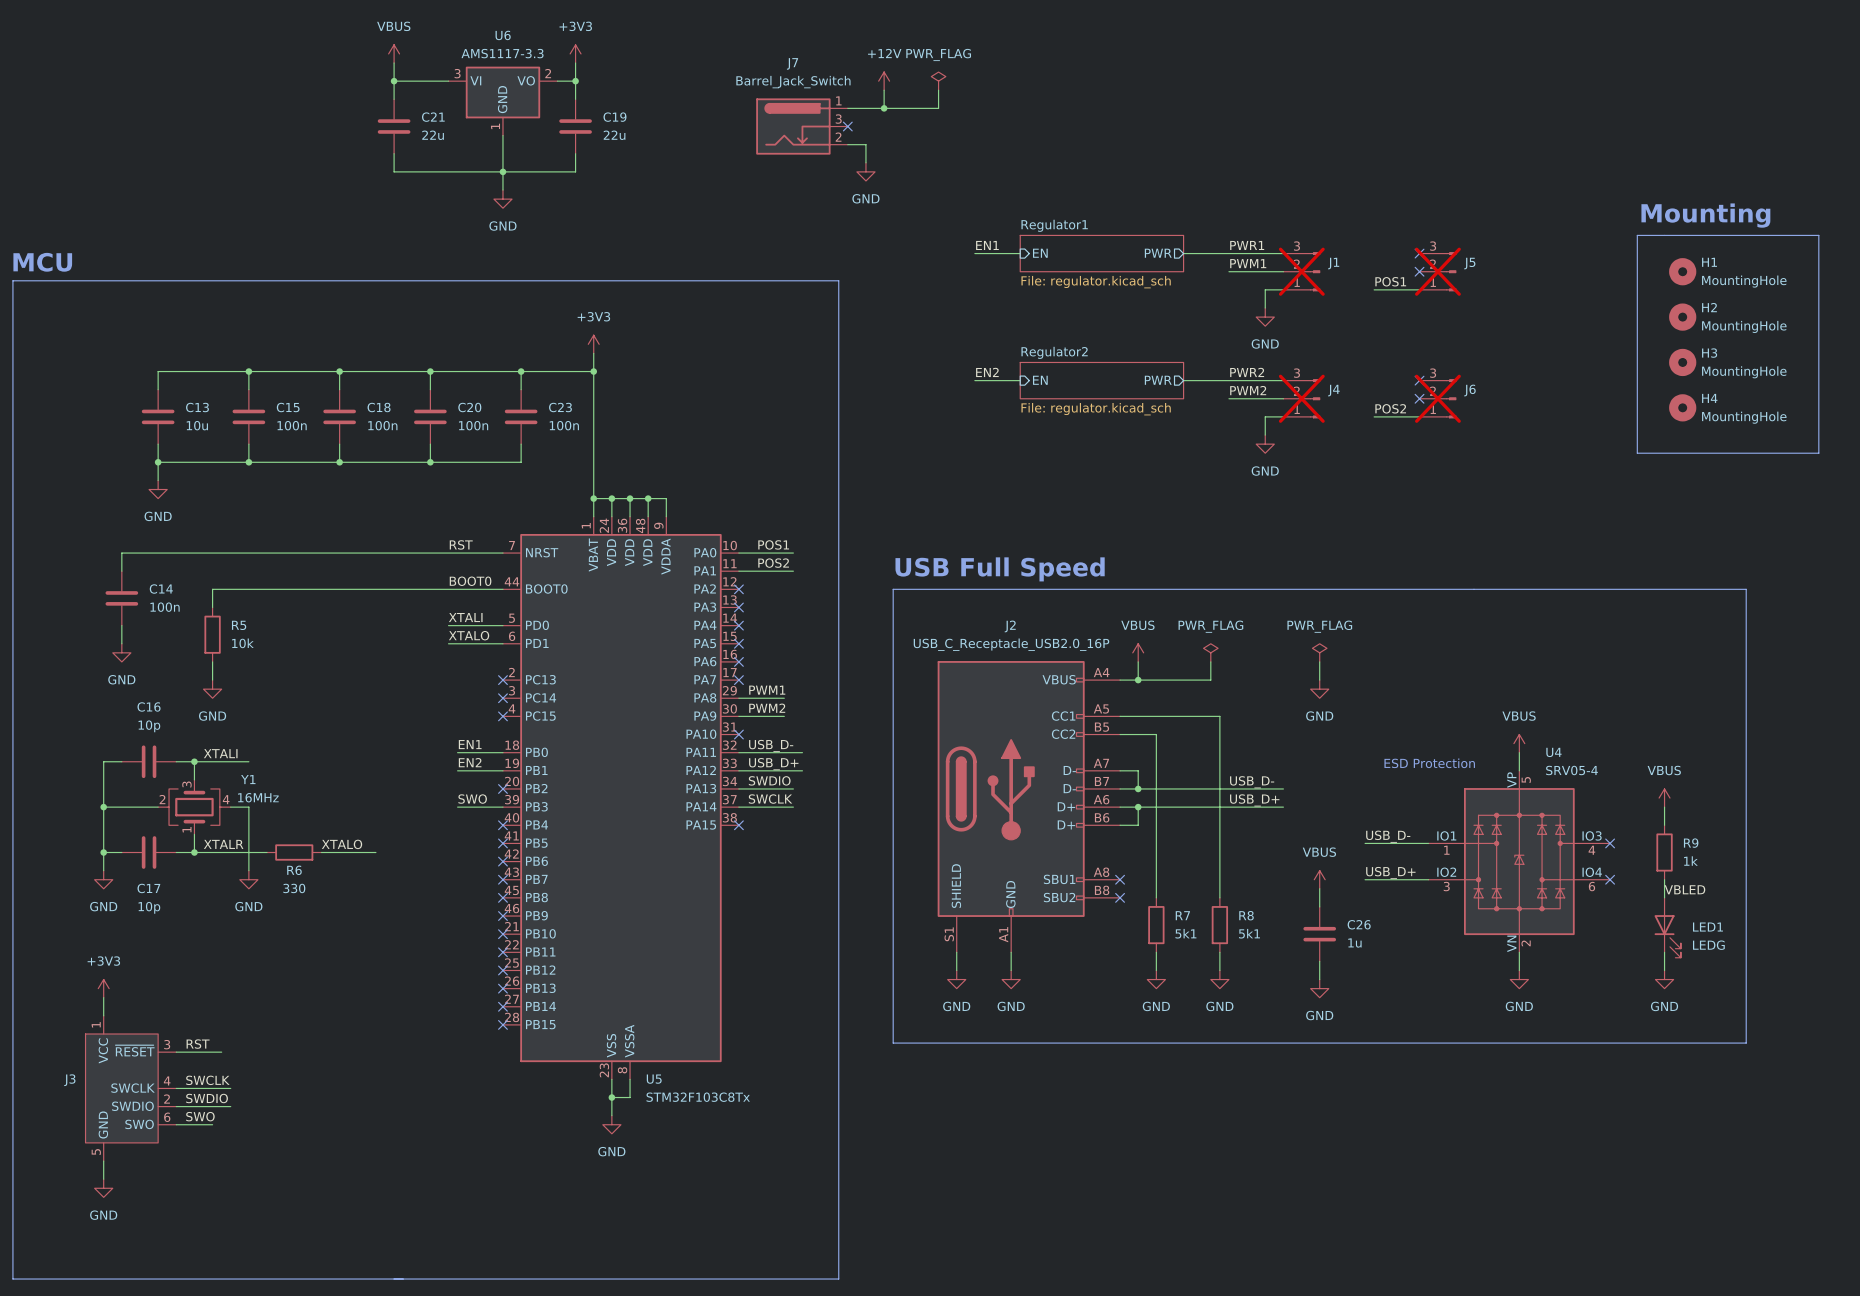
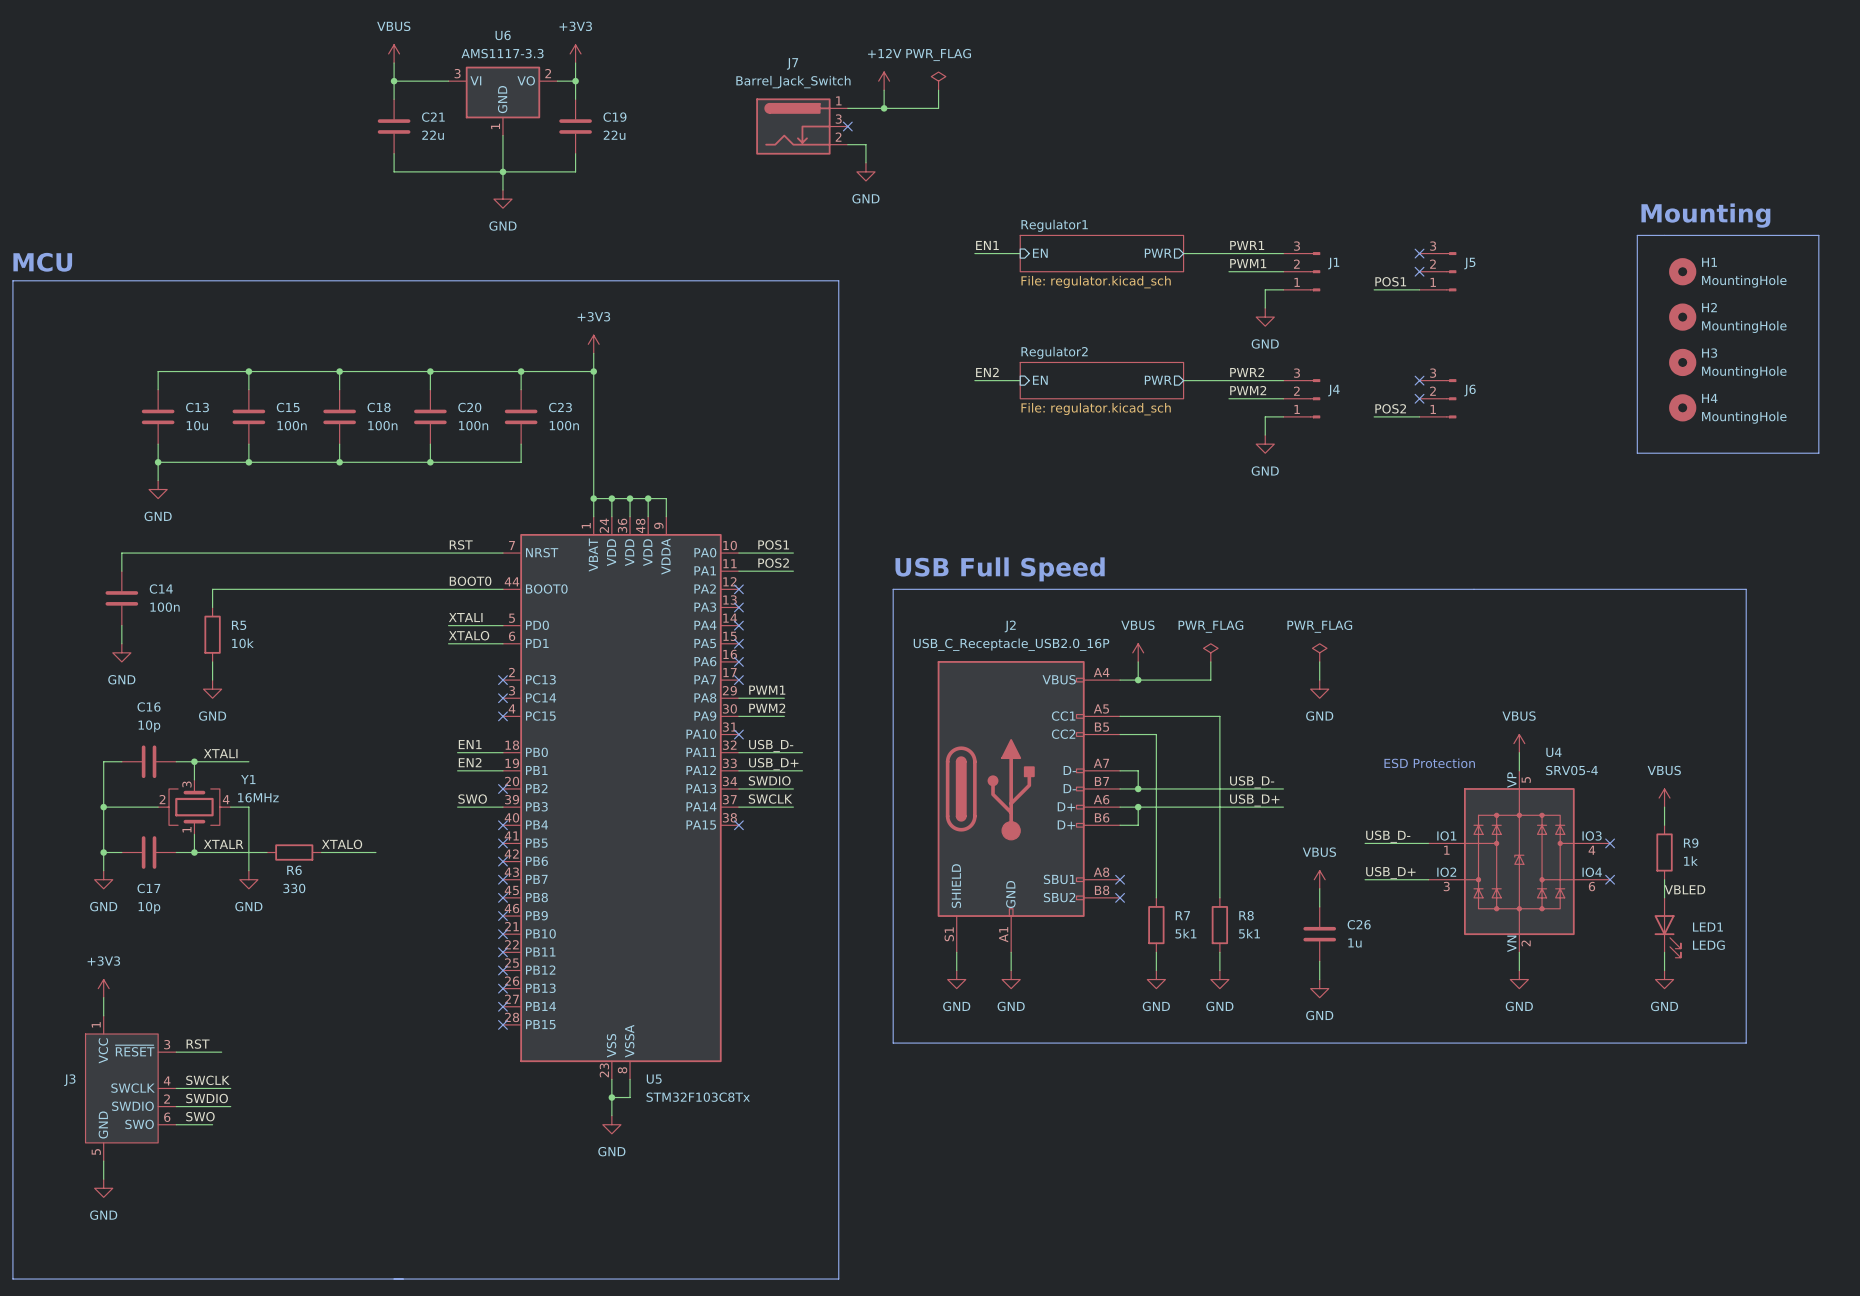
J1 do-not-place cross: (1301, 271) -> none
J5 do-not-place cross: (1437, 271) -> none
J4 do-not-place cross: (1301, 398) -> none
J6 do-not-place cross: (1437, 398) -> none

